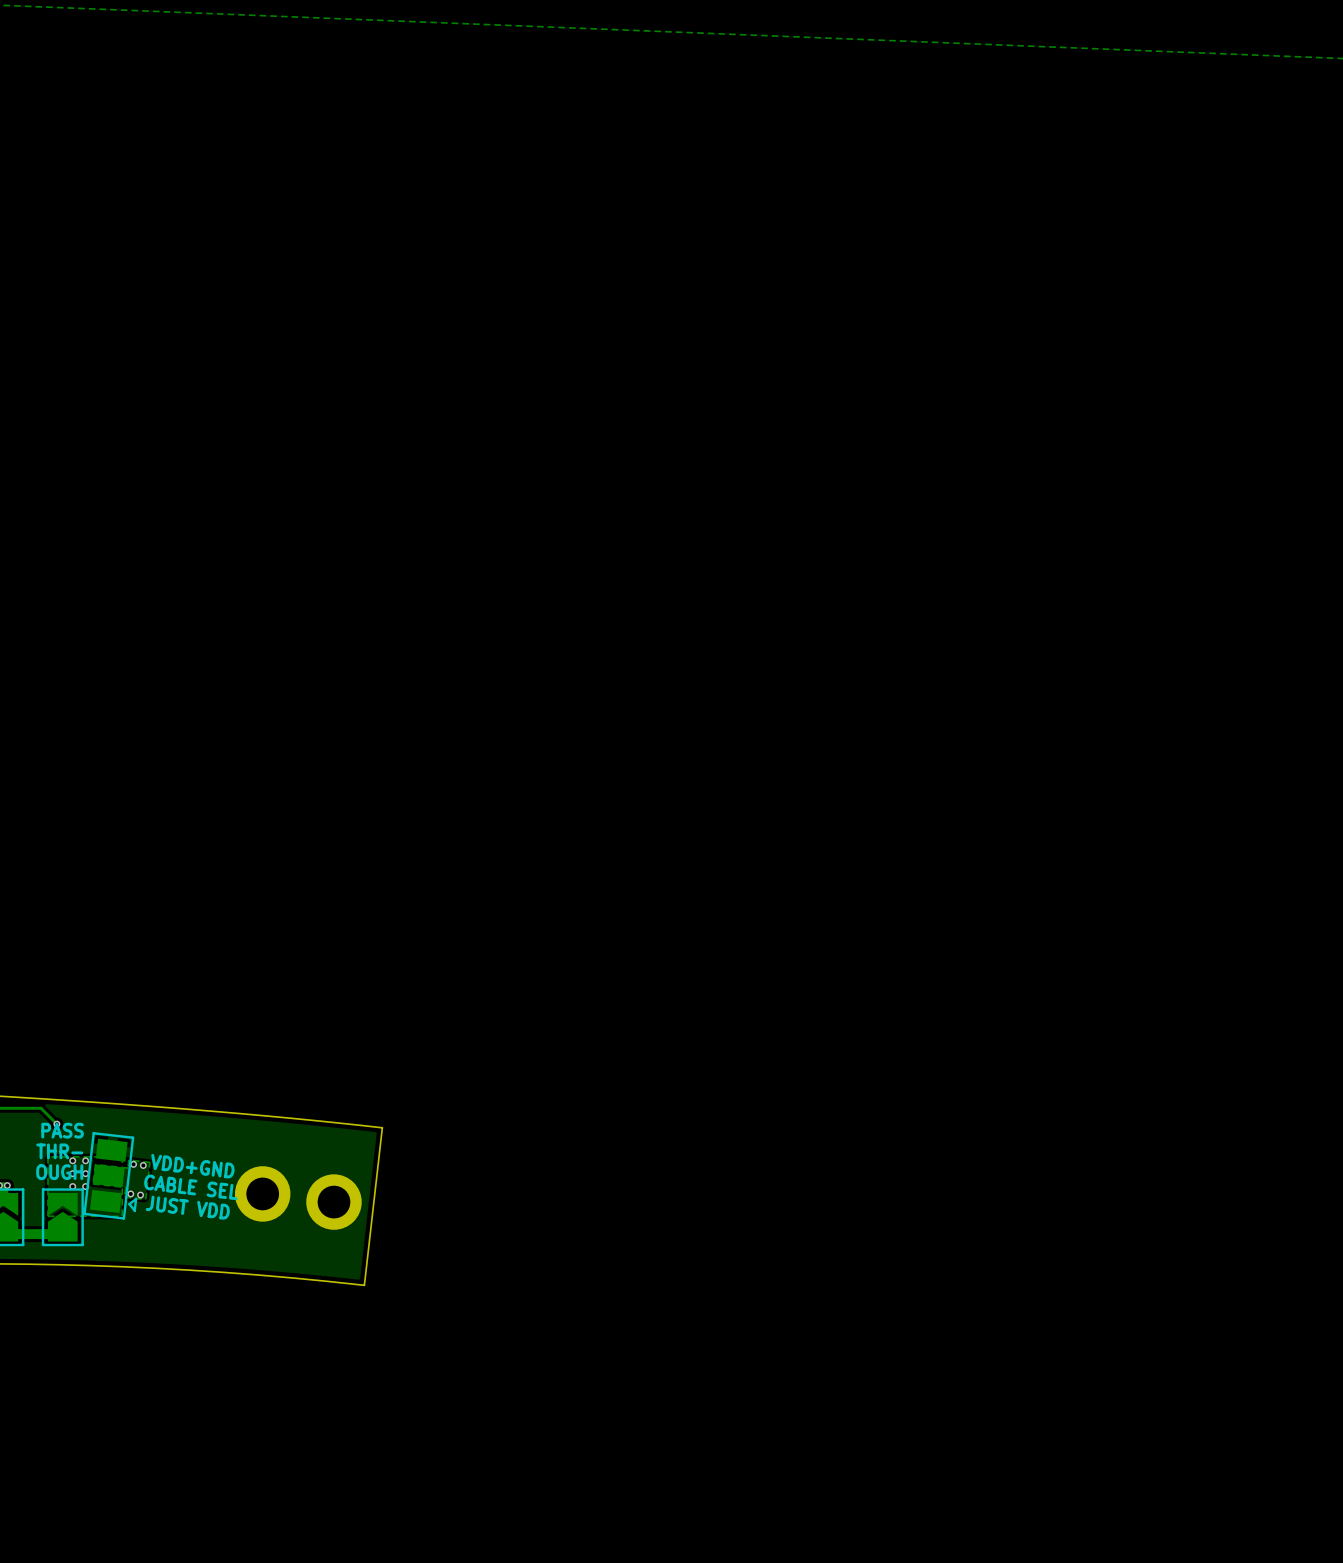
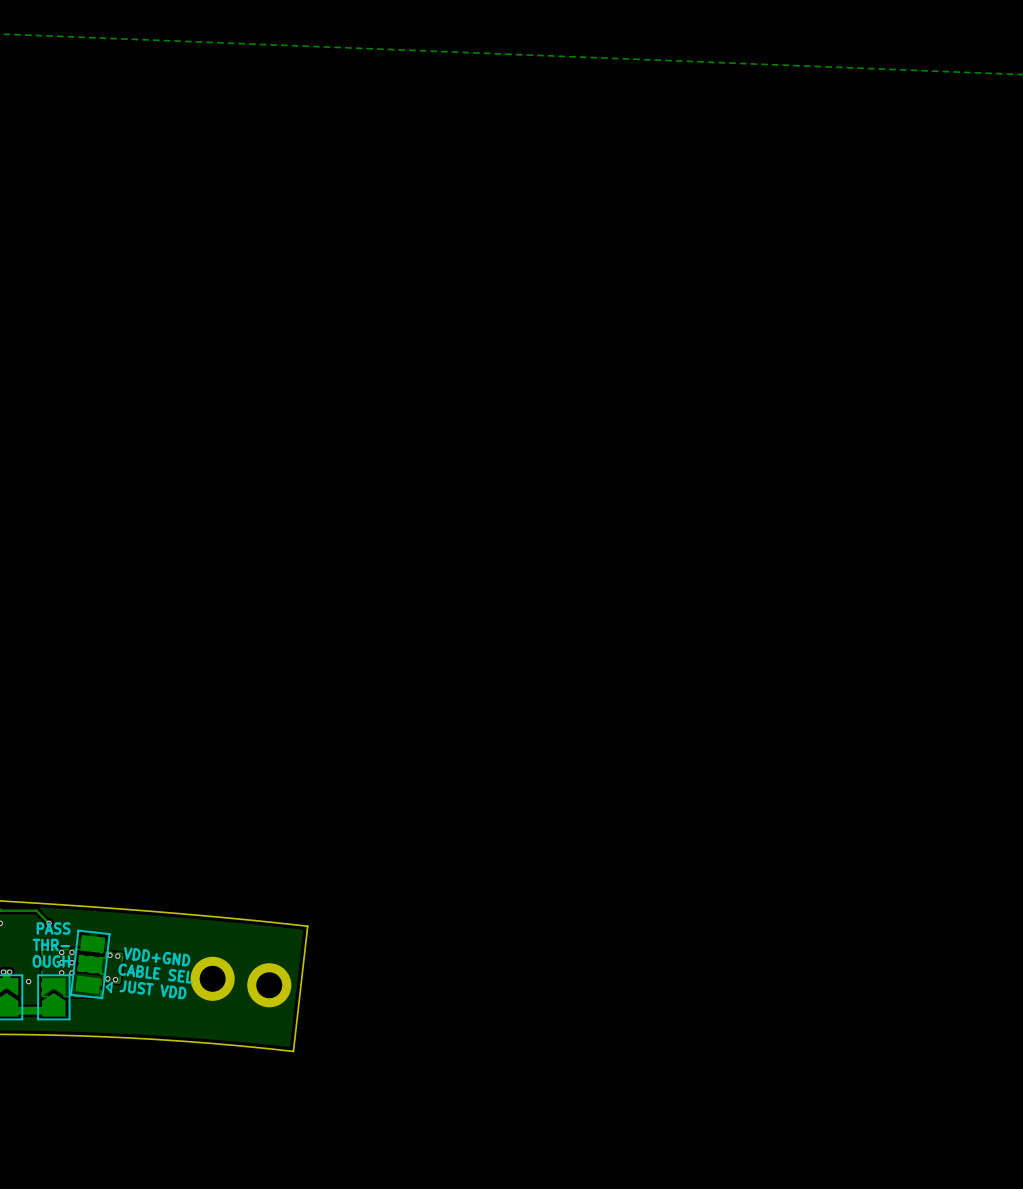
via: none -> (28, 981)

